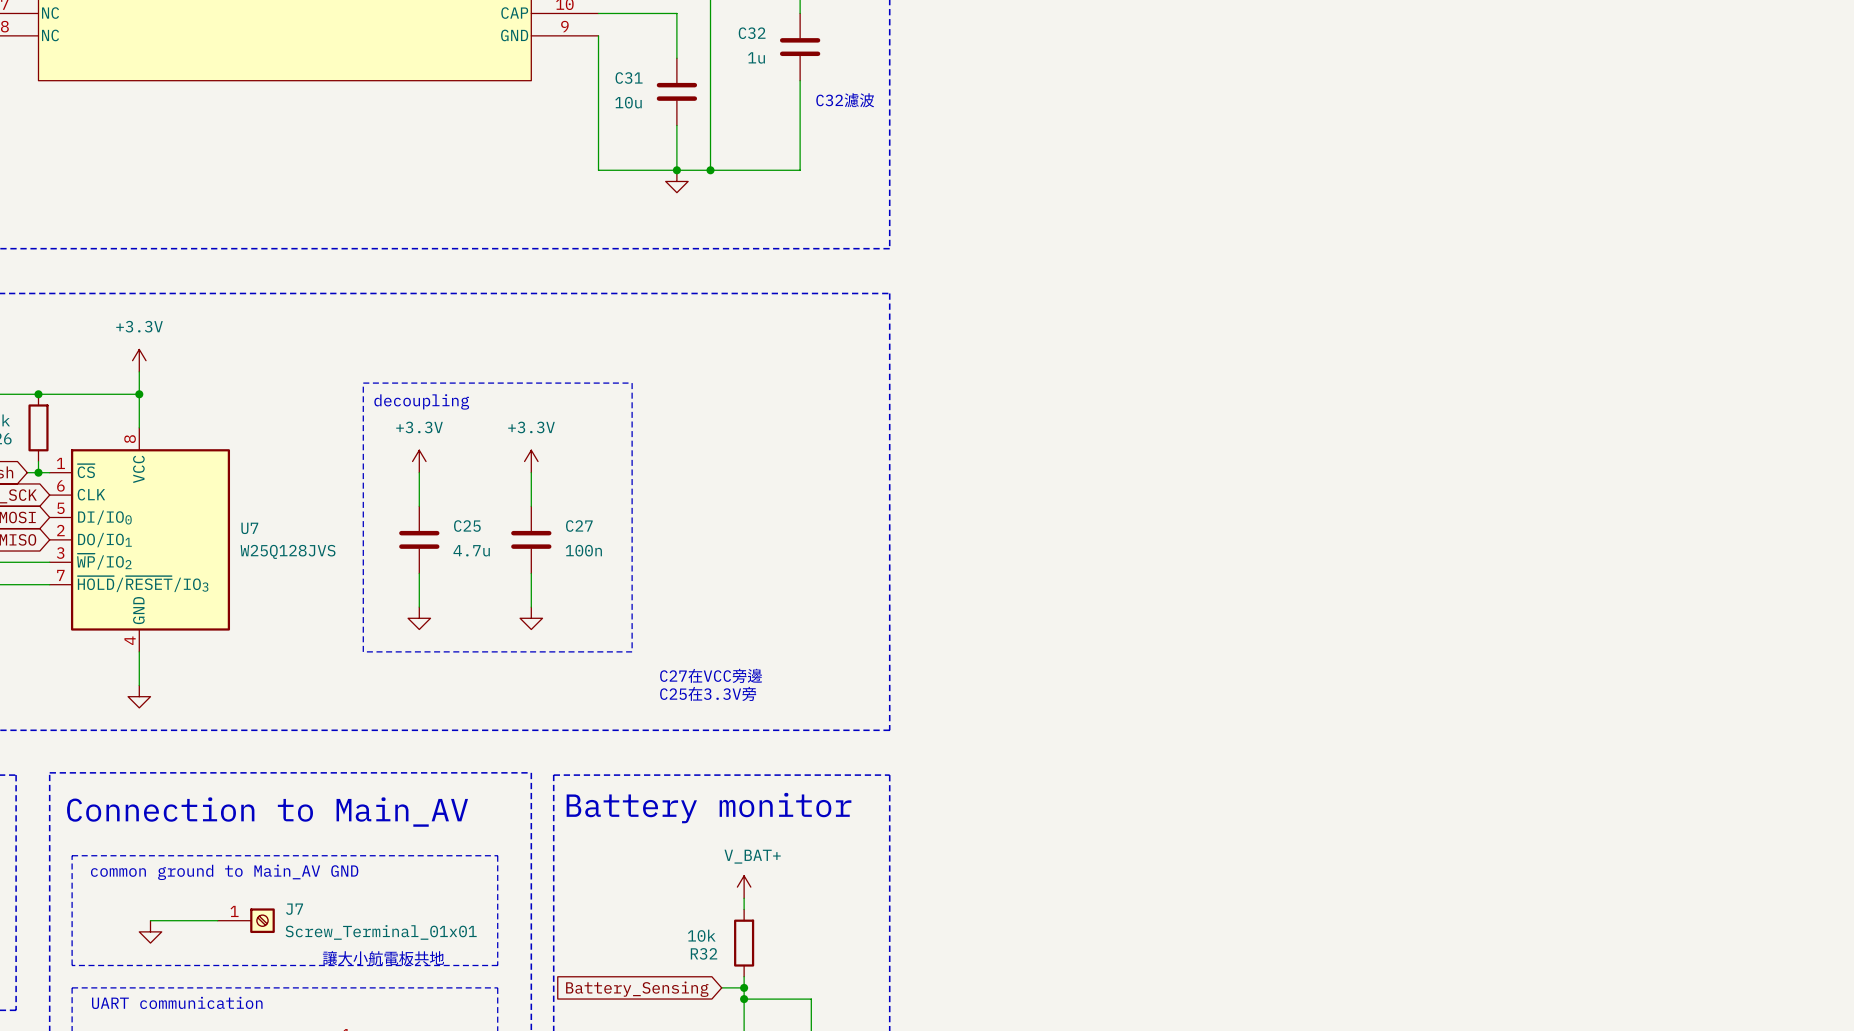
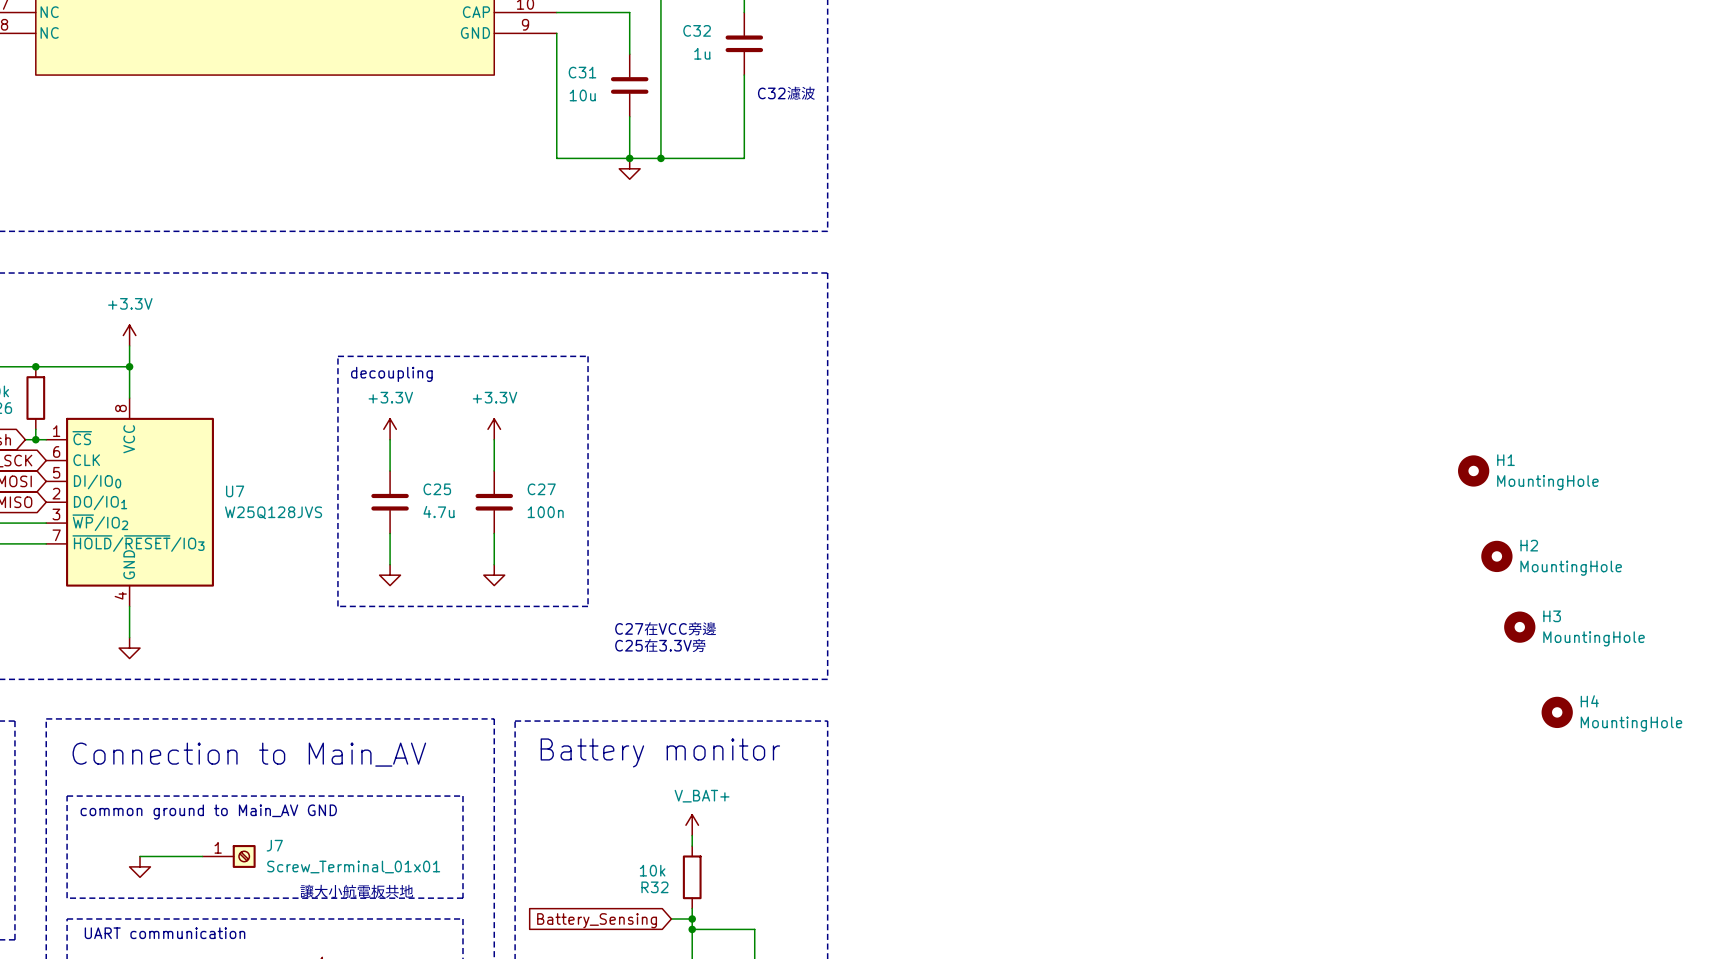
H1: none -> MountingHole (1473, 470)
H2: none -> MountingHole (1496, 556)
H3: none -> MountingHole (1519, 627)
H4: none -> MountingHole (1557, 712)

